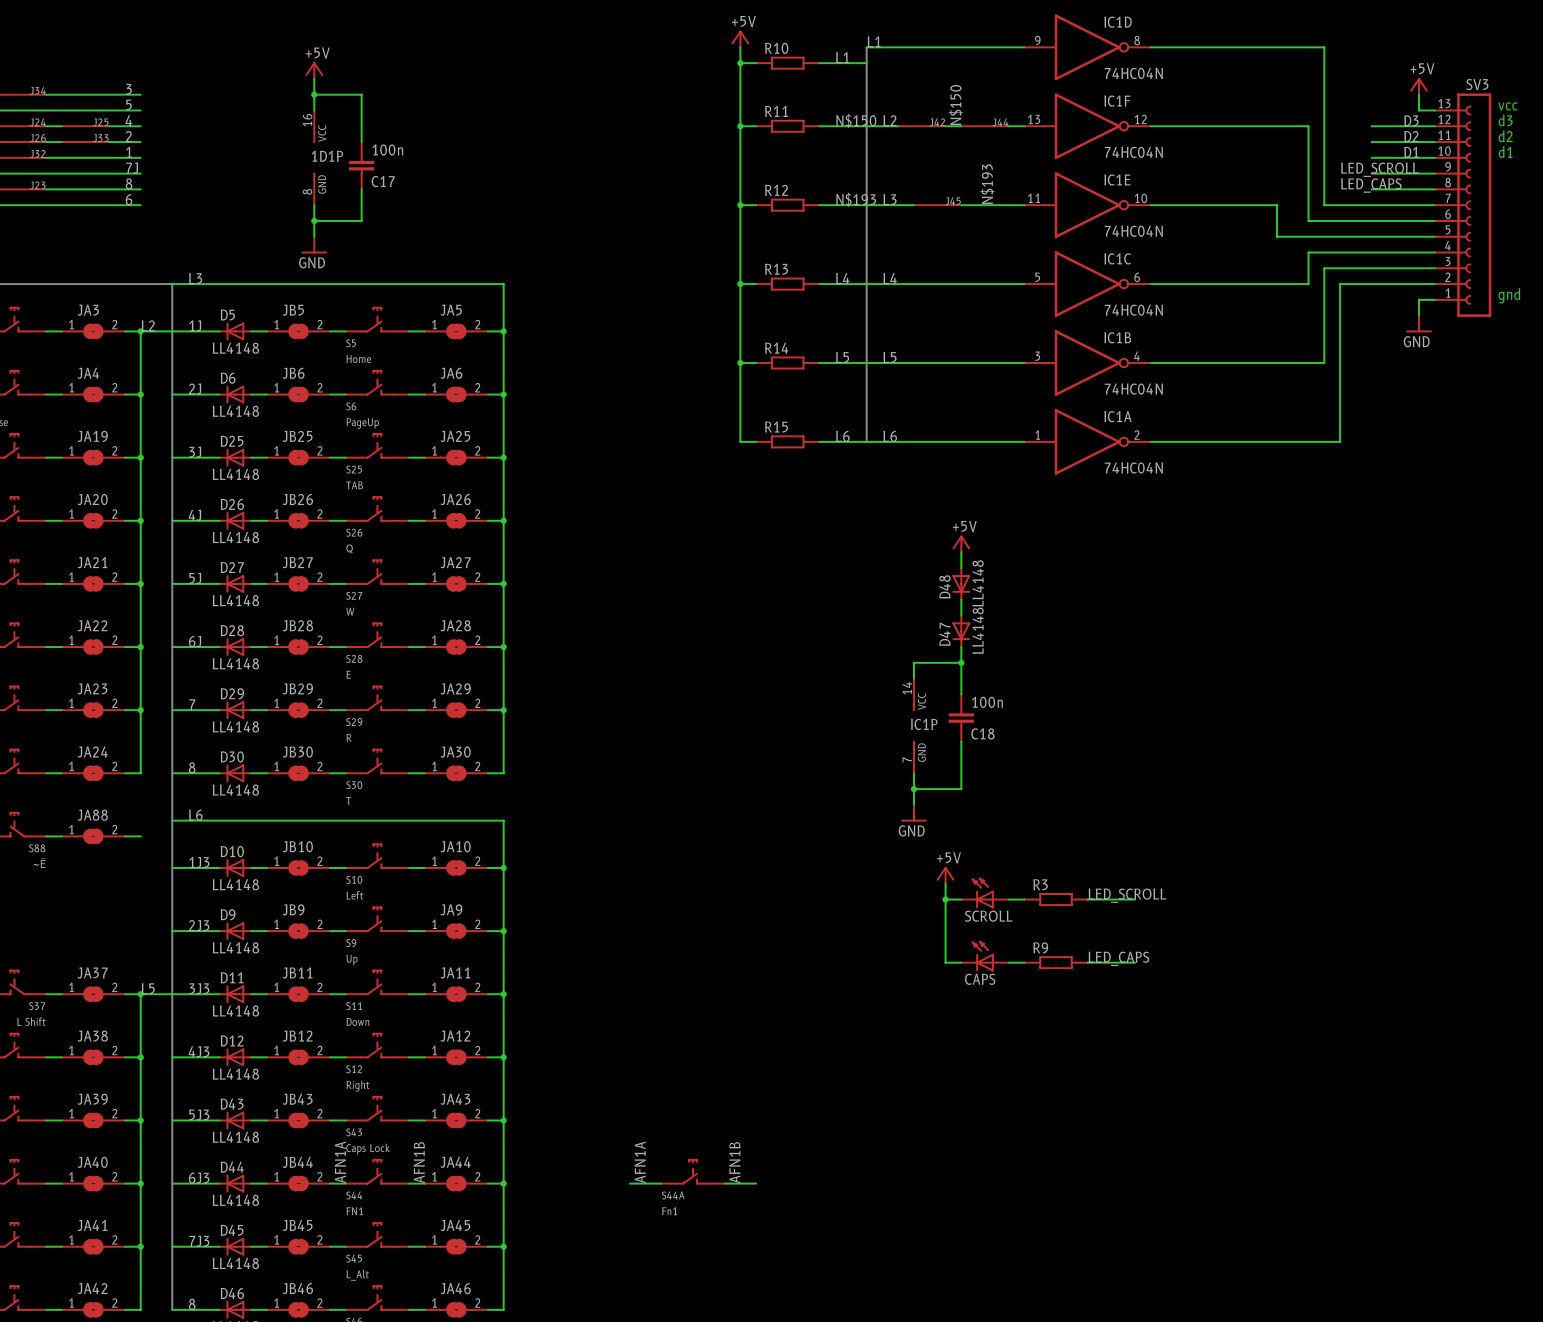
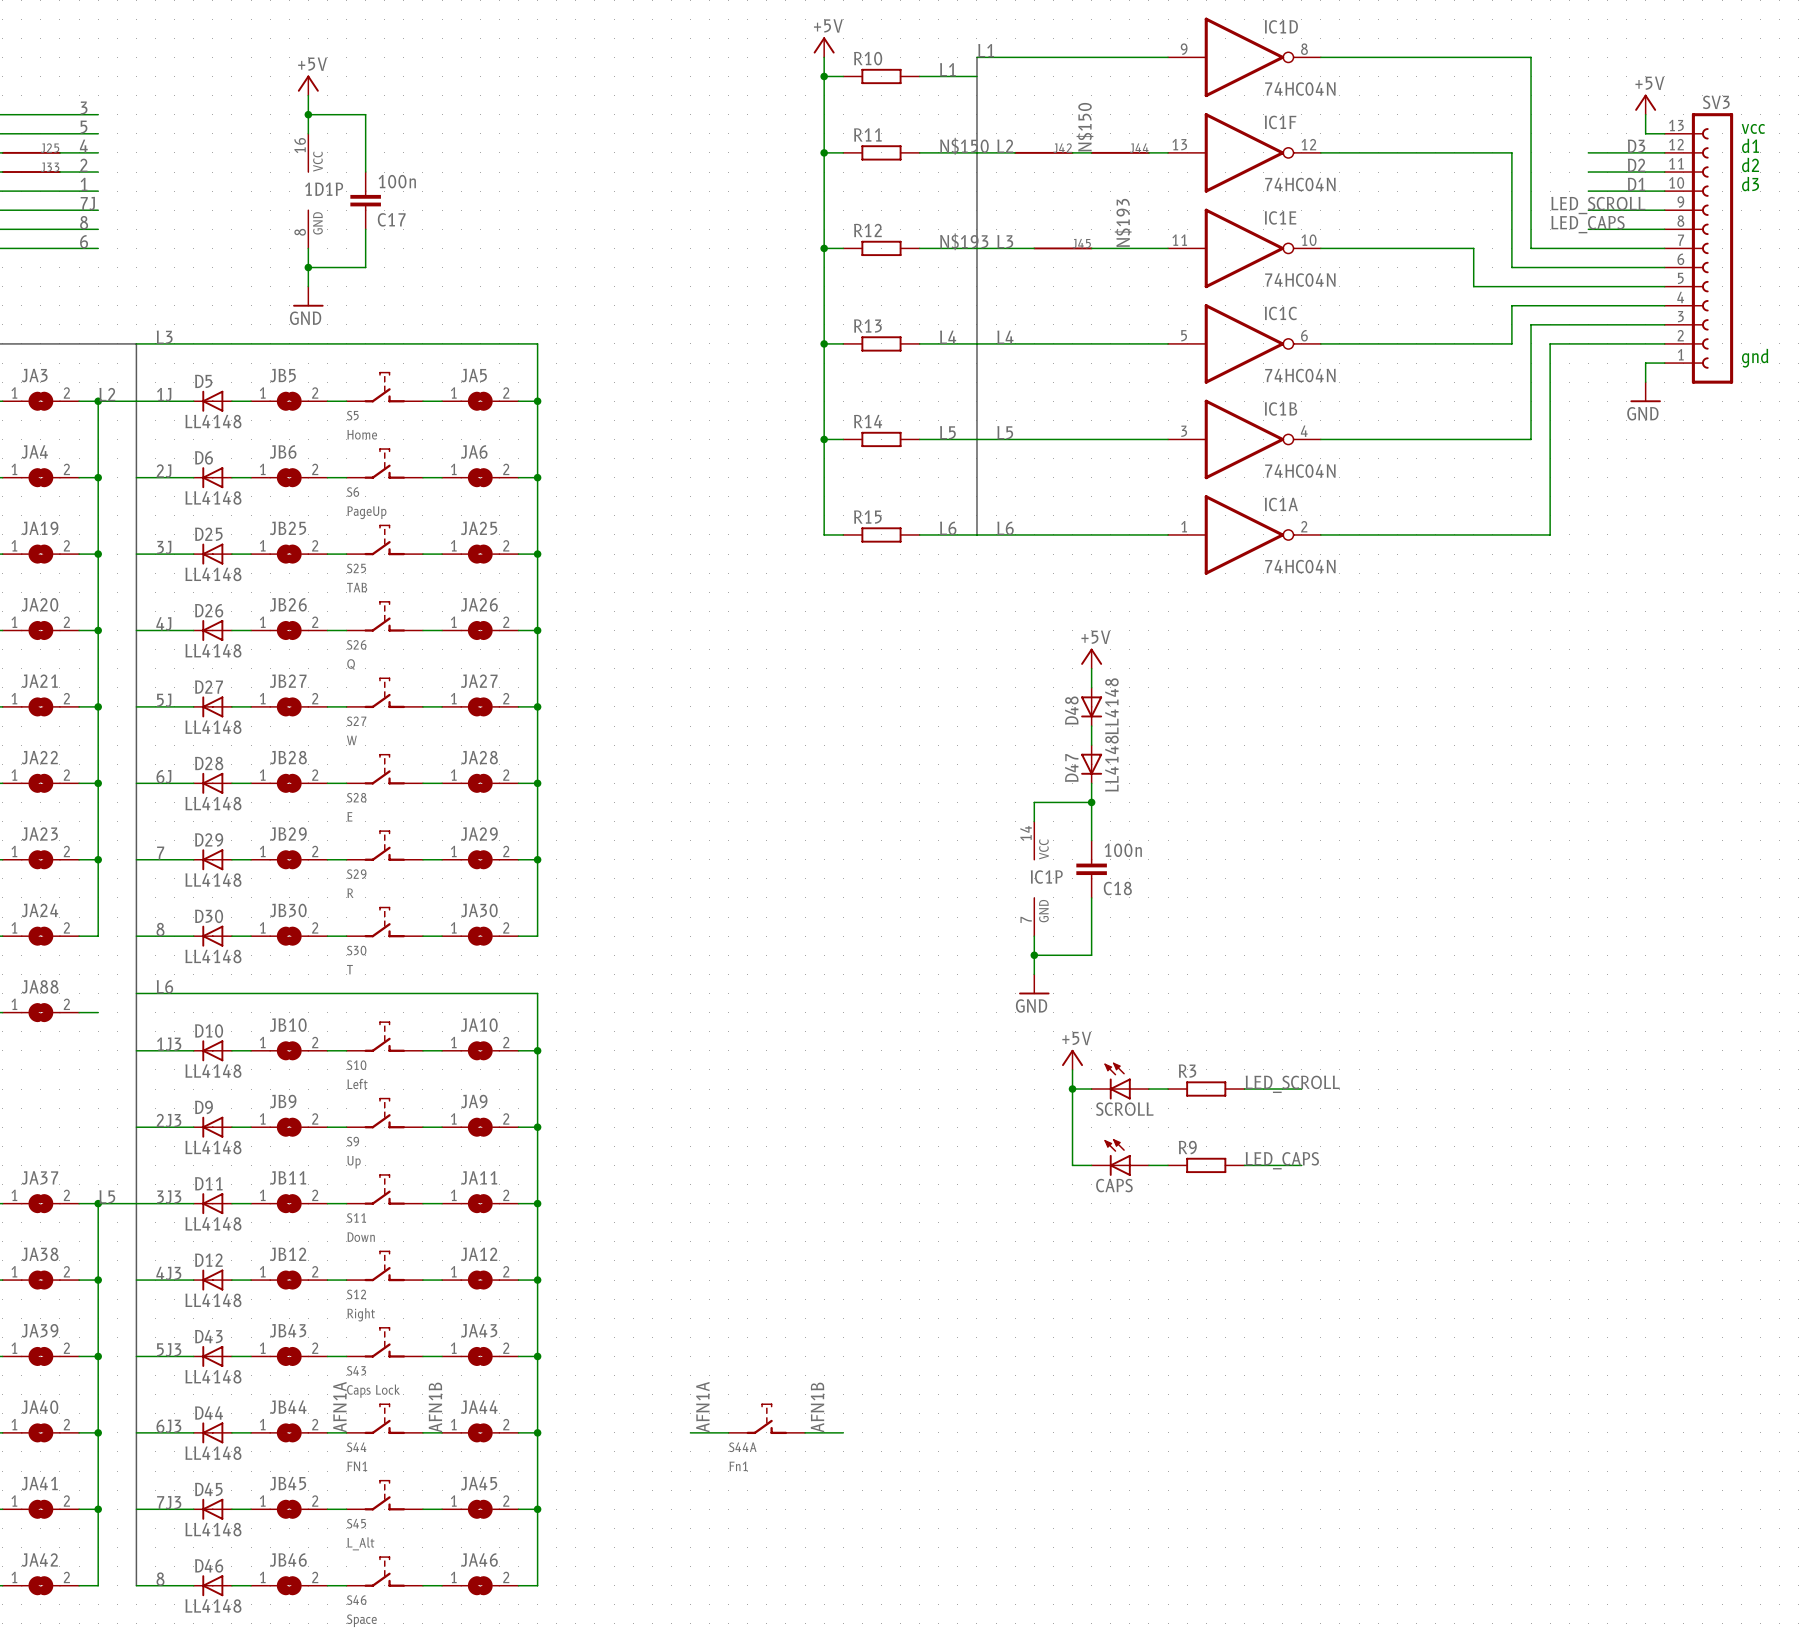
text: d3 (1505, 120) -> d1 (1750, 145)
text: d1 (1505, 152) -> d3 (1750, 184)

